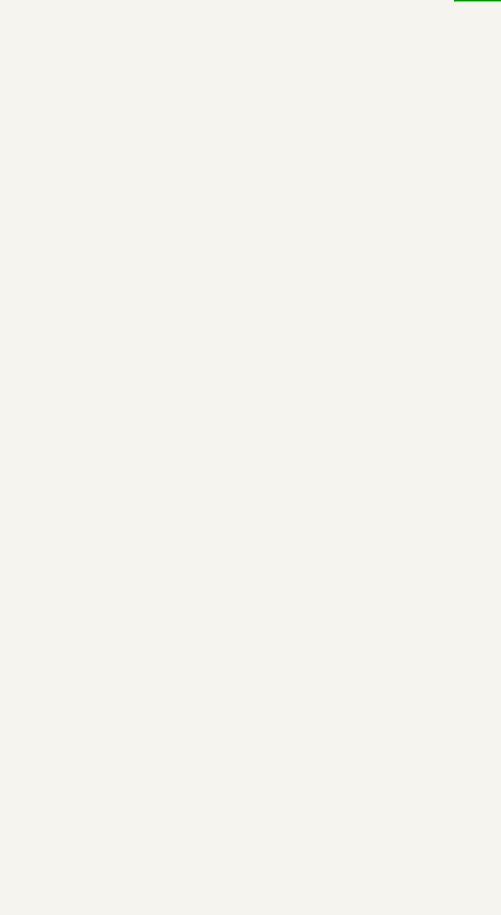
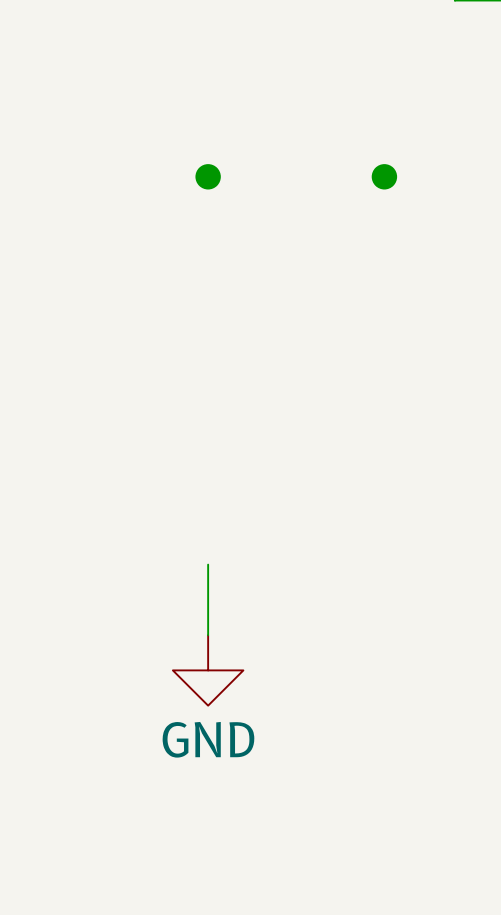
junction: none -> (208, 176)
junction: none -> (384, 176)
wire: none -> (208, 564) (208, 635)
power symbol: none -> GND (208, 670)

